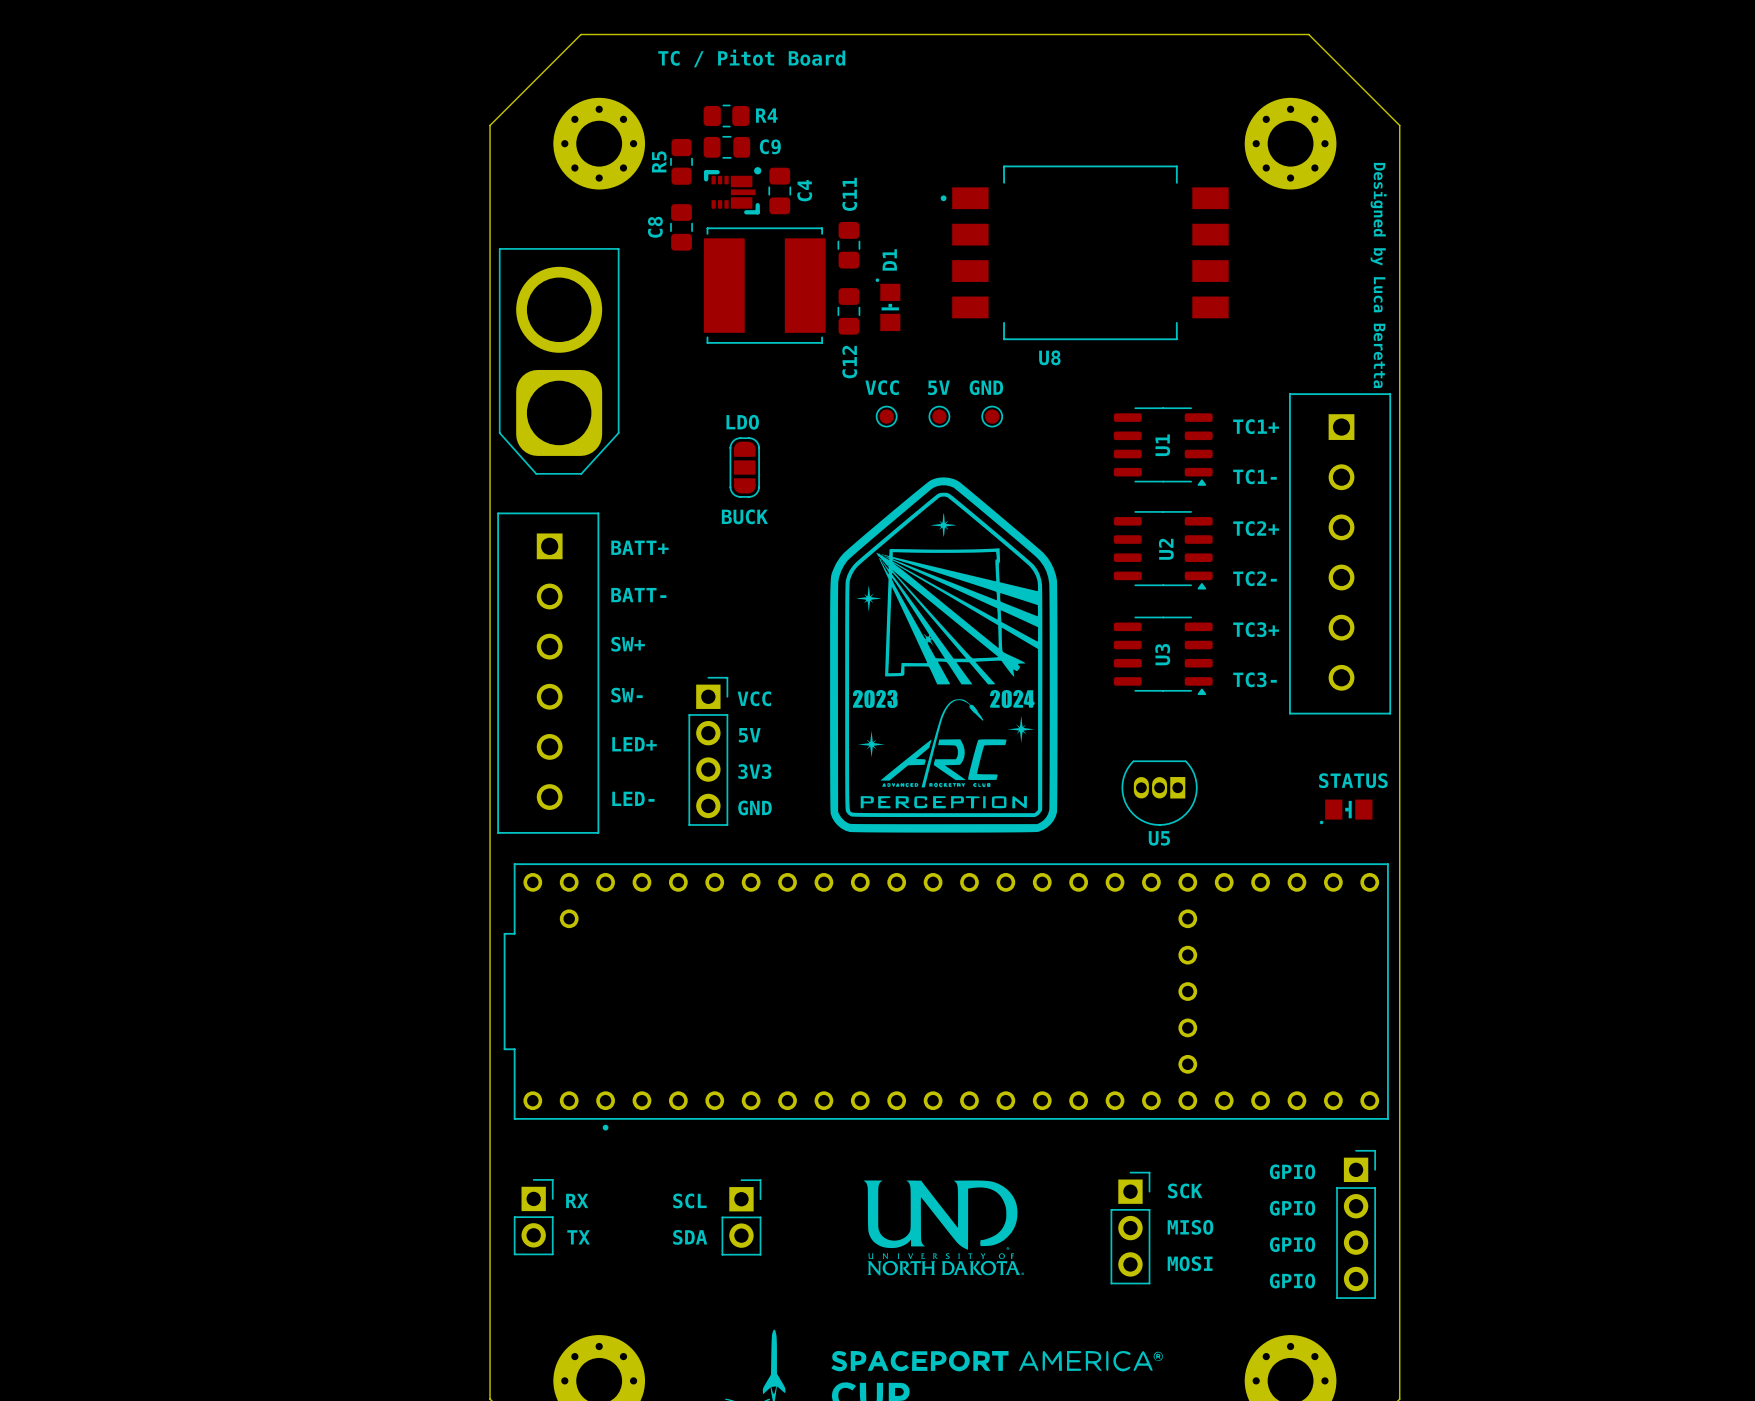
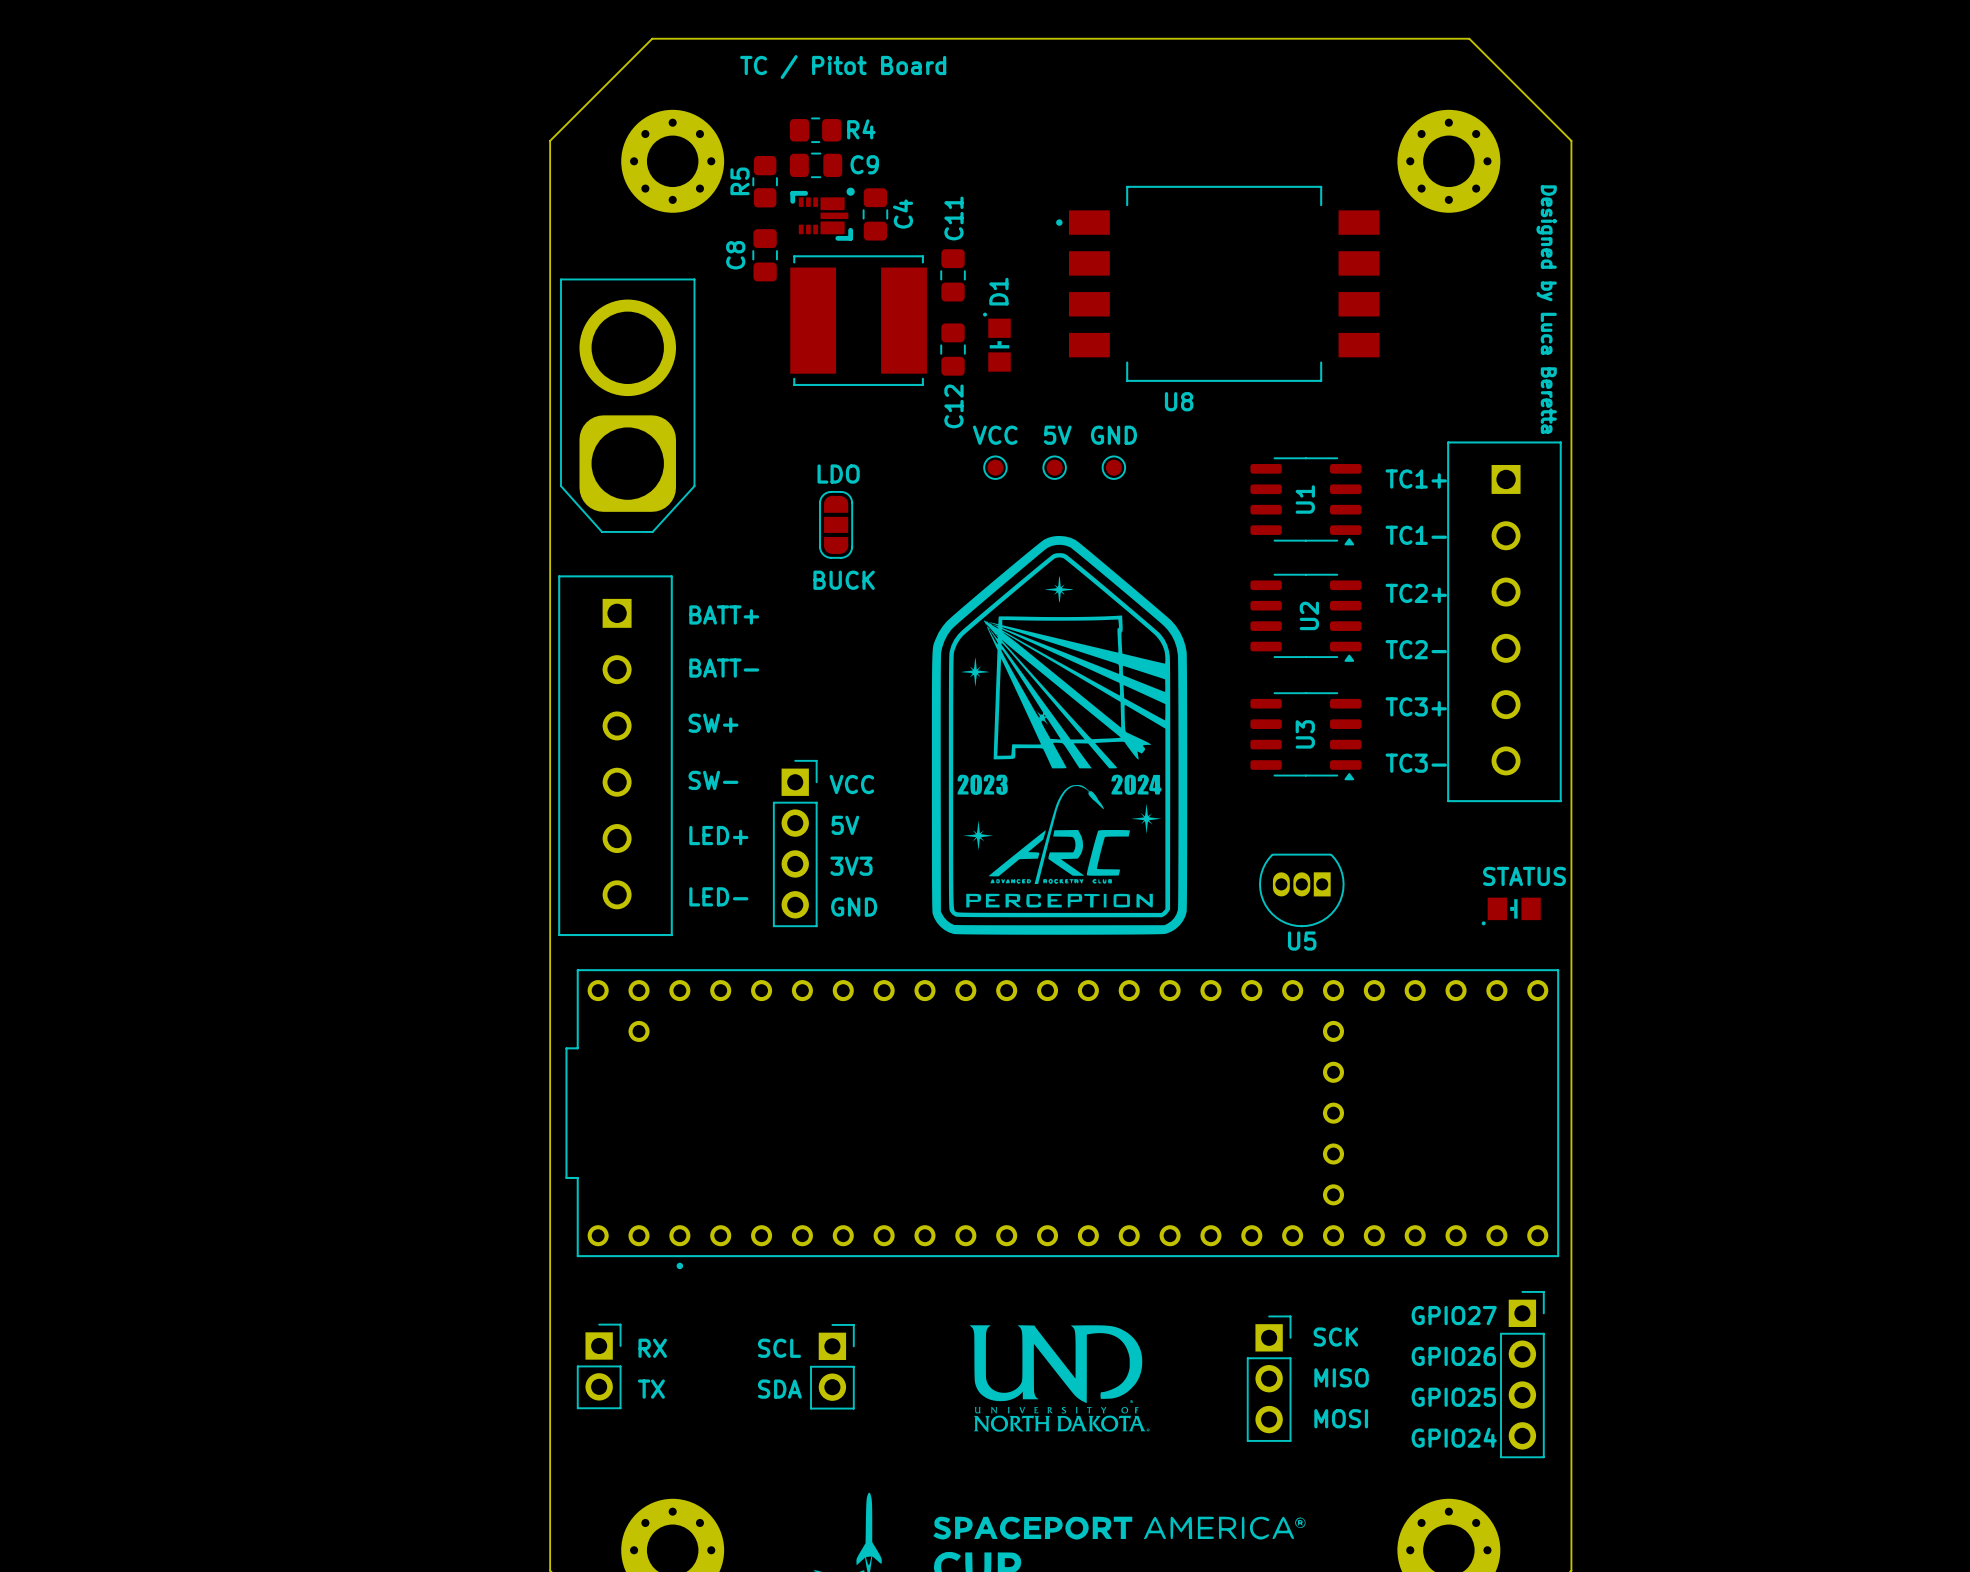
text: GPIO (1292, 1171) -> GPIO27 (1454, 1315)
text: GPIO (1292, 1208) -> GPIO26 (1453, 1356)
text: GPIO (1292, 1244) -> GPIO25 (1453, 1397)
text: GPIO (1292, 1281) -> GPIO24 (1454, 1437)

